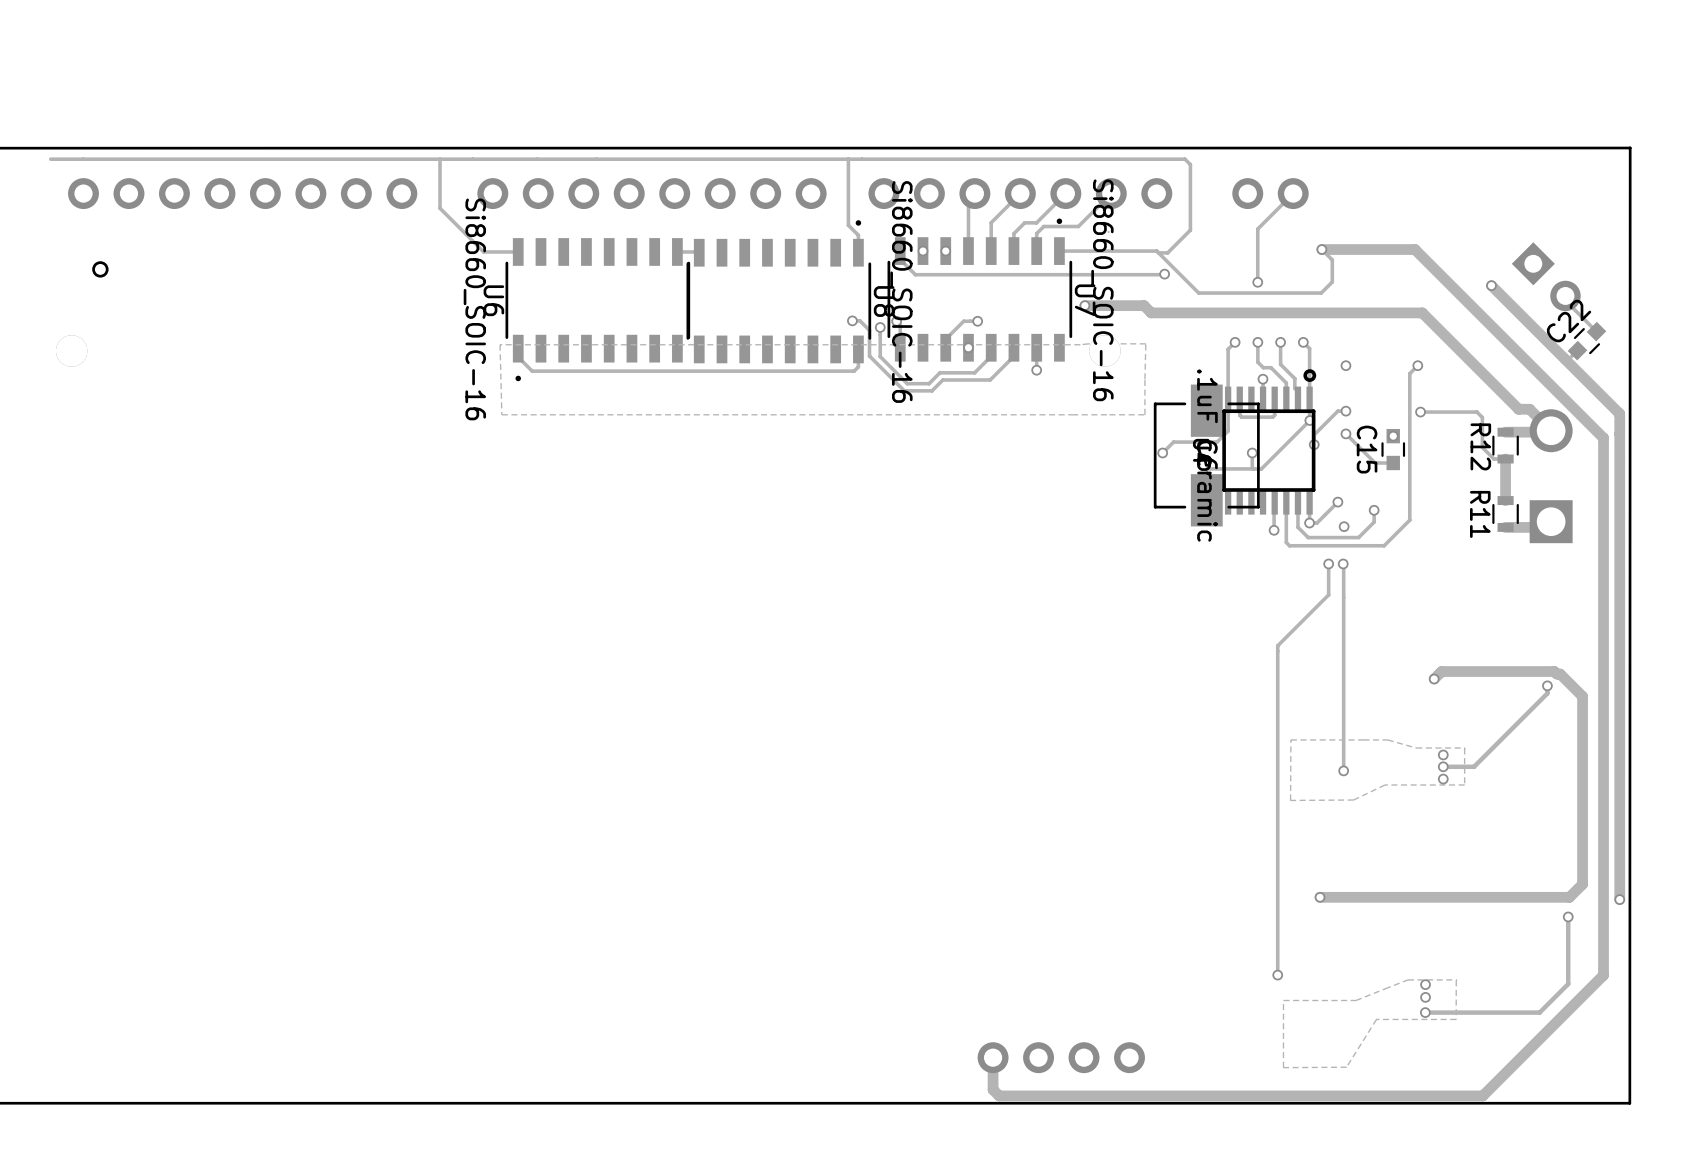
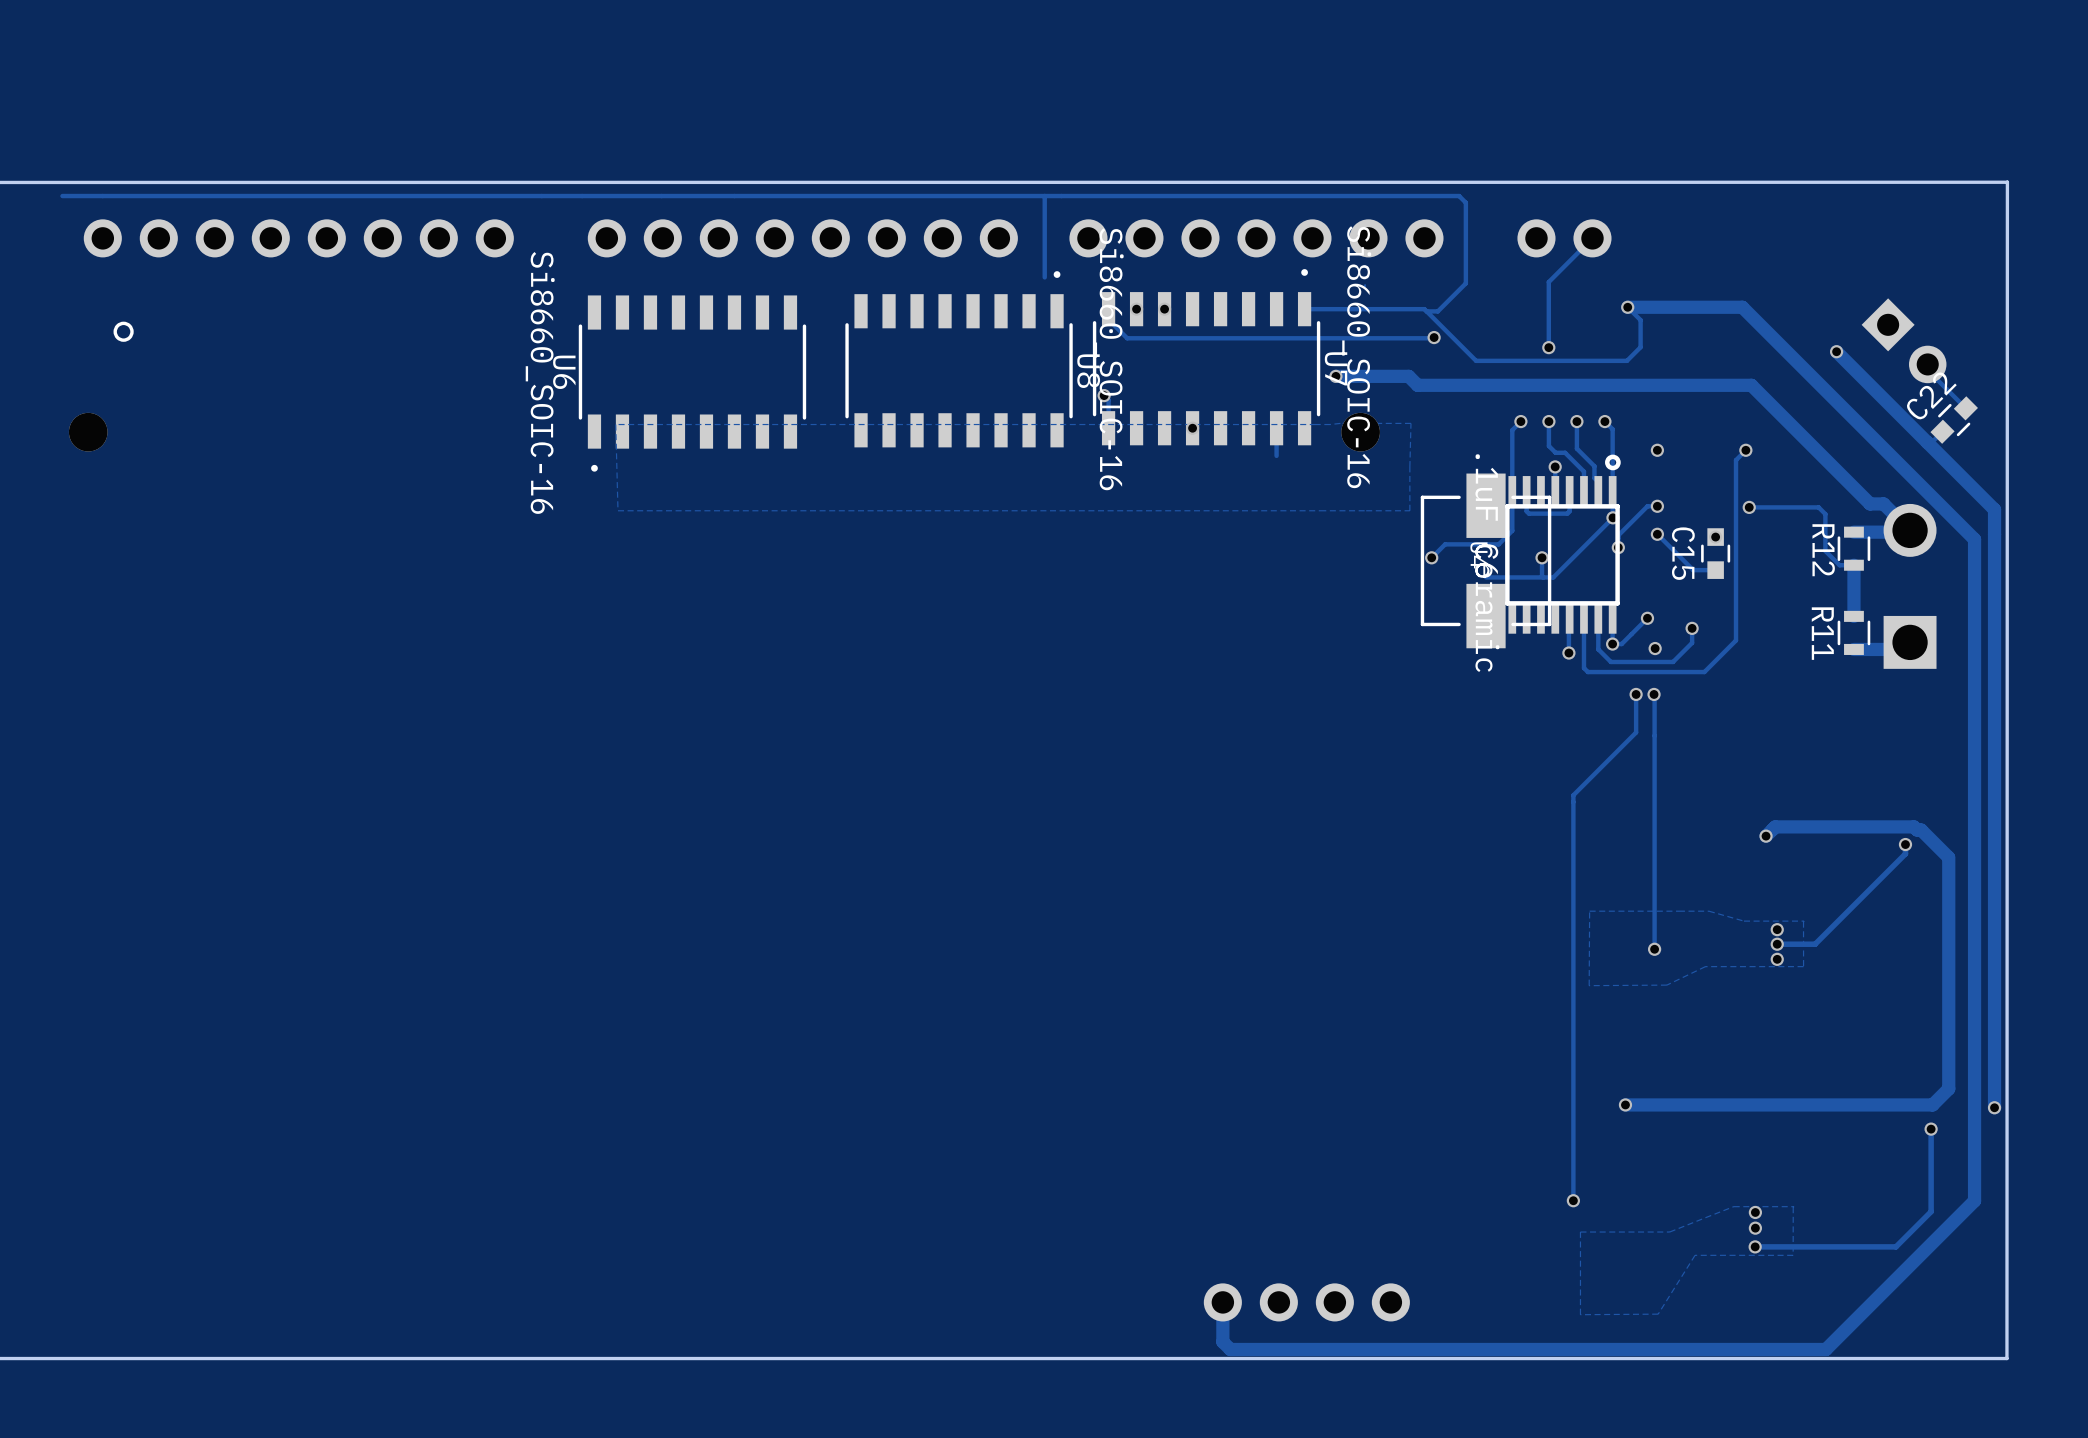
track: (440, 159) (440, 208) (483, 251) (518, 251) -> none
track: (1020, 193) (991, 222) (991, 251) -> none
track: (1065, 193) (1036, 222) (1024, 222) (1013, 233) (1013, 251) -> none
track: (1111, 193) (1078, 226) (1043, 226) (1036, 233) (1036, 251) -> none
track: (968, 199) (968, 251) -> none
track: (848, 225) (858, 235) (858, 252) -> none
track: (677, 251) (699, 252) -> none
U6 position: (597, 309) -> (692, 383)
track: (854, 319) (852, 320) (860, 320) (869, 330) (869, 356) (904, 390) (932, 390) (942, 379) (990, 379) (1013, 356) (1013, 347) -> none
via: (852, 320) -> none
track: (977, 321) (963, 321) (945, 339) (945, 347) -> none
via: (977, 321) -> none
via: (880, 327) -> none
track: (881, 327) (880, 356) (907, 383) (929, 383) (939, 372) (974, 372) (991, 356) (991, 347) -> none
track: (518, 348) (518, 357) (532, 371) (854, 371) (858, 366) (858, 349) -> none
via: (1036, 370) -> none

